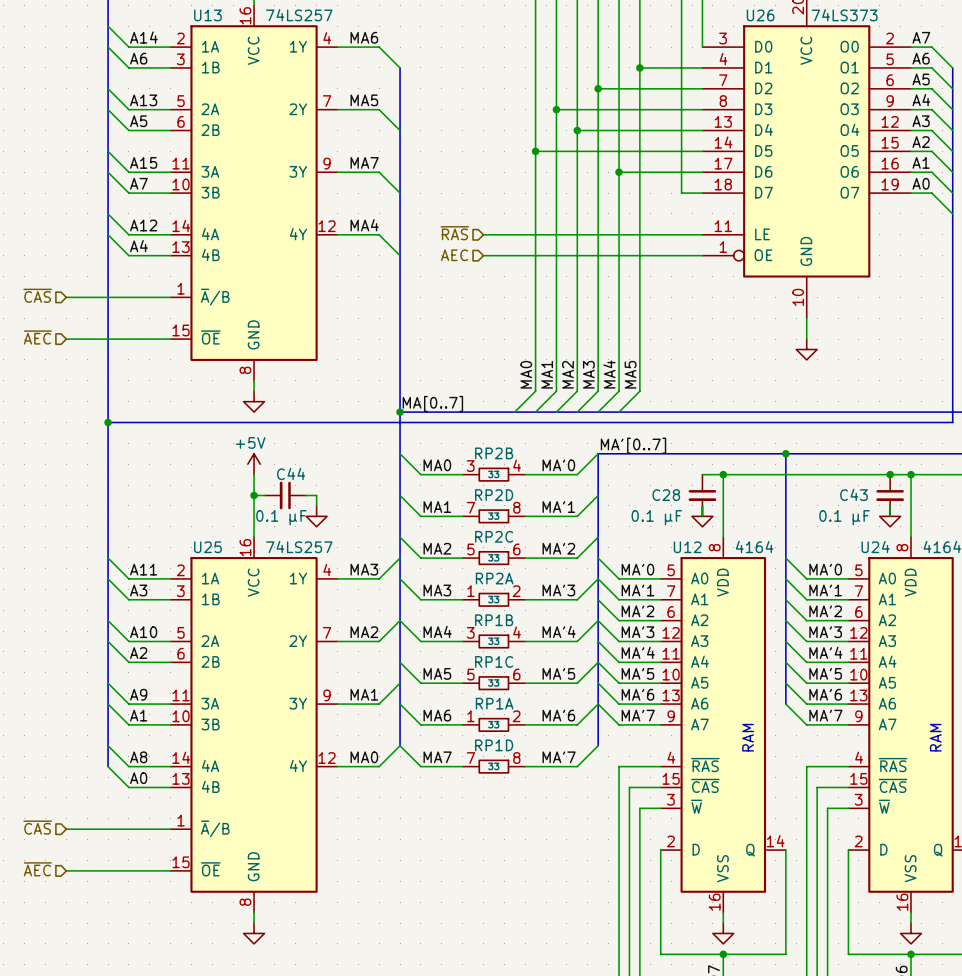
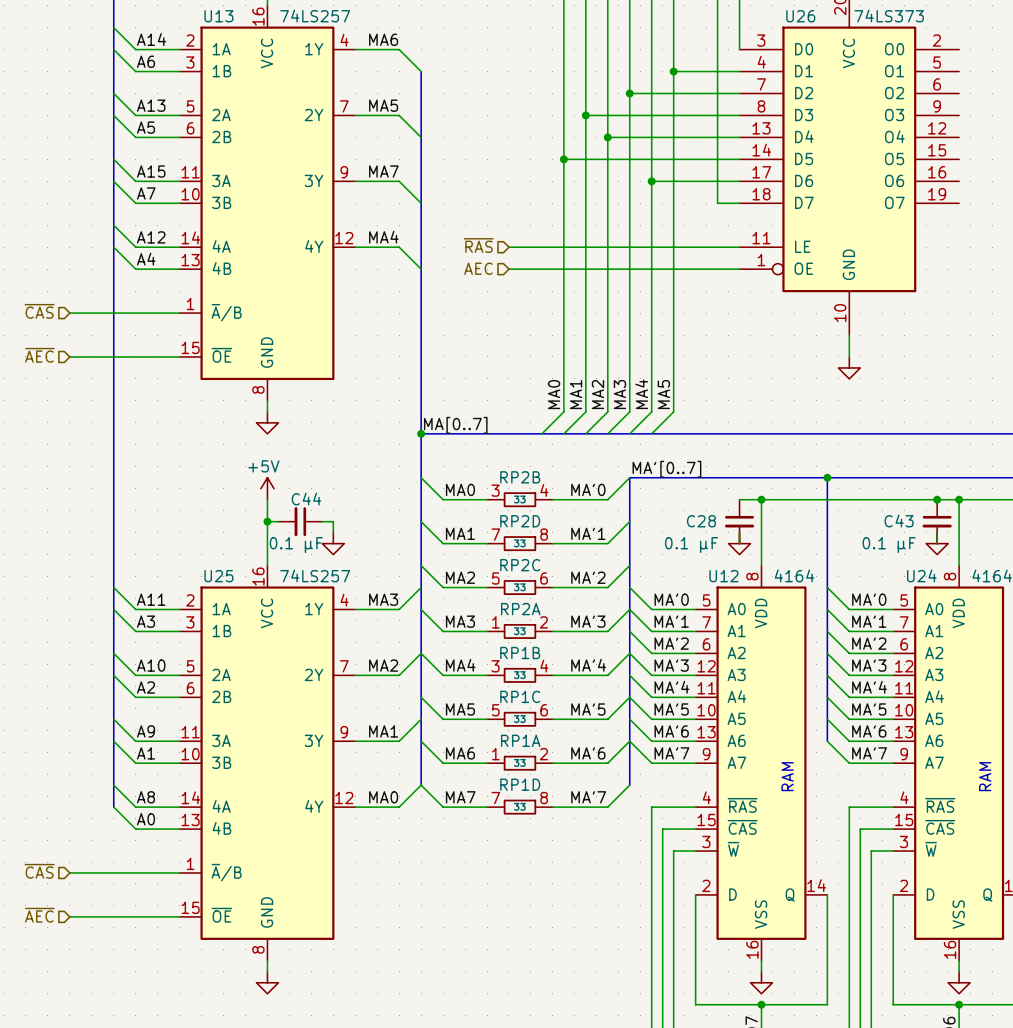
label: A7 (921, 37) -> none
wire: (910, 47) (931, 47) (952, 67) -> none
label: A6 (921, 58) -> none
wire: (910, 67) (931, 67) (952, 88) -> none
bus: (952, 67) (952, 422) (108, 422) -> none
label: A5 (921, 79) -> none
wire: (910, 88) (931, 88) (952, 109) -> none
label: A4 (921, 100) -> none
wire: (910, 109) (931, 109) (952, 130) -> none
label: A3 (921, 121) -> none
wire: (910, 130) (931, 130) (952, 151) -> none
label: A2 (921, 142) -> none
wire: (910, 151) (931, 151) (952, 172) -> none
label: A1 (921, 162) -> none
wire: (910, 172) (931, 172) (952, 193) -> none
label: A0 (921, 183) -> none
wire: (910, 193) (931, 193) (952, 213) -> none
junction: (108, 422) -> none

